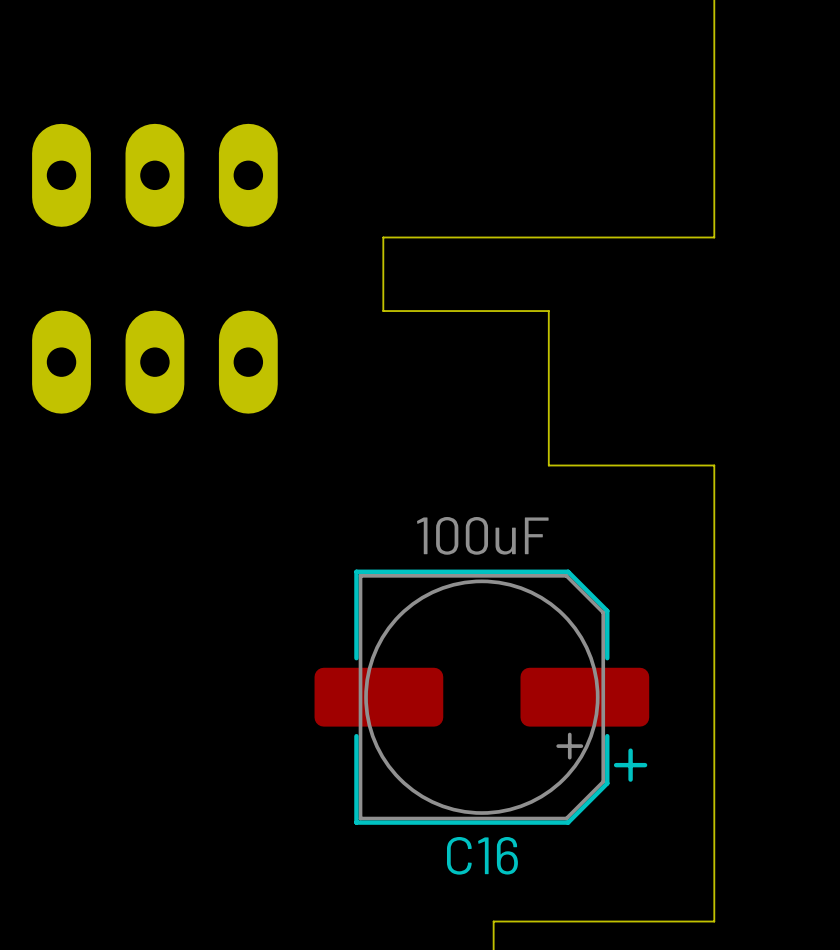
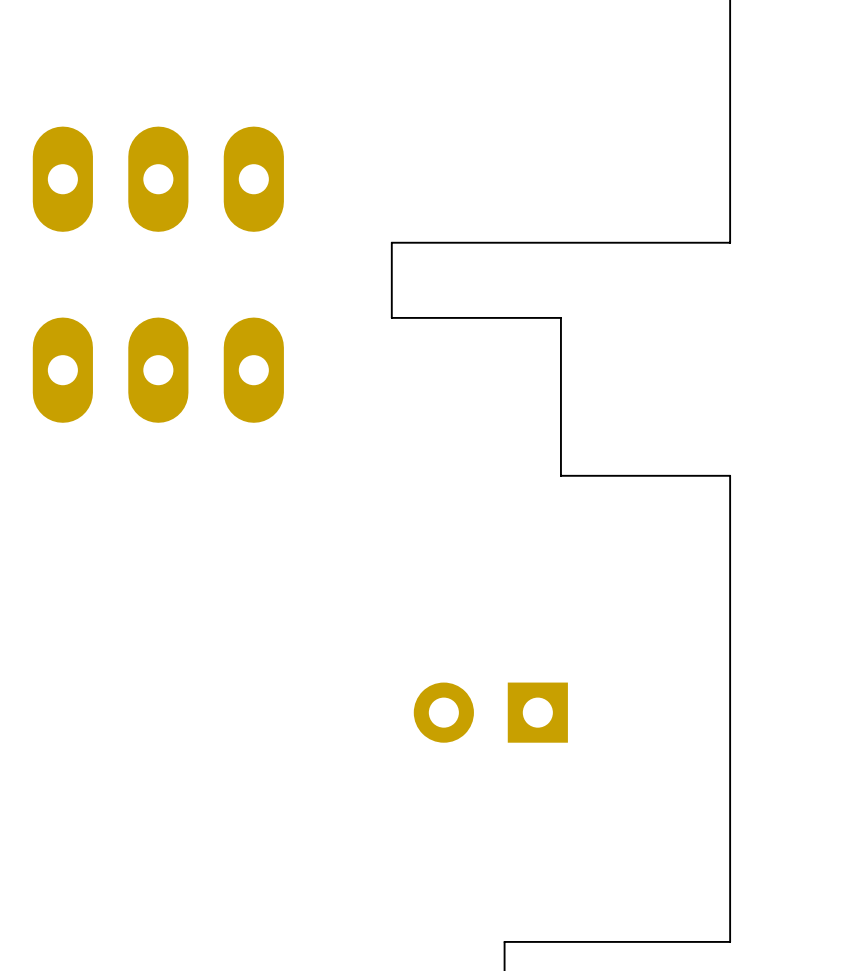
part: none -> (490, 712)
C16: 100uF (481, 697) -> none

